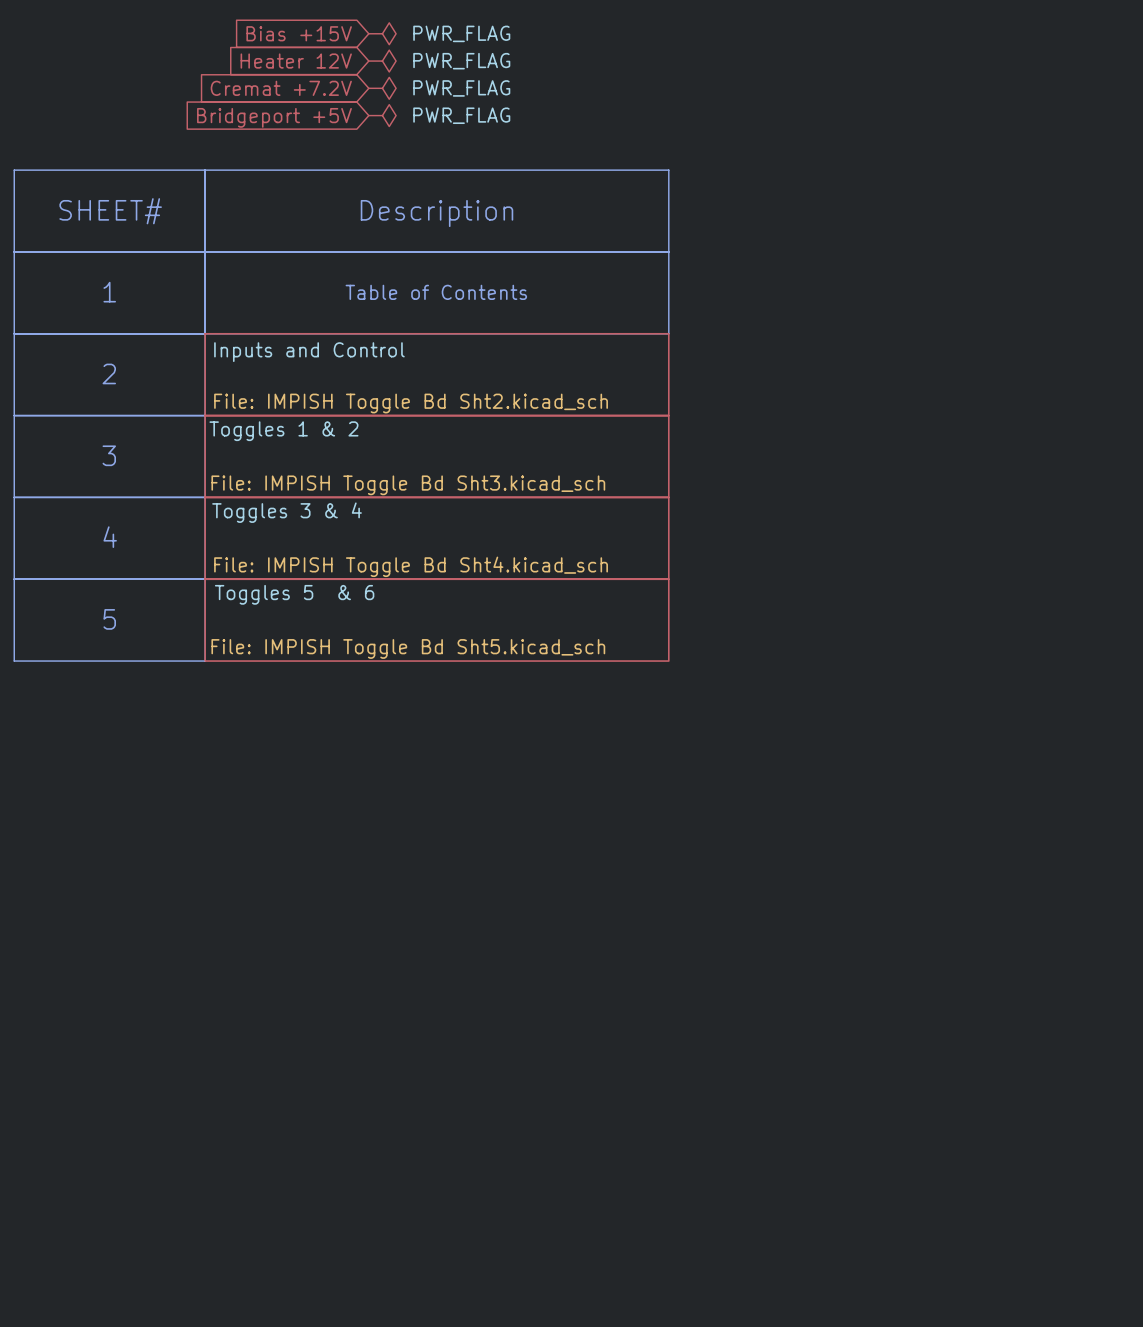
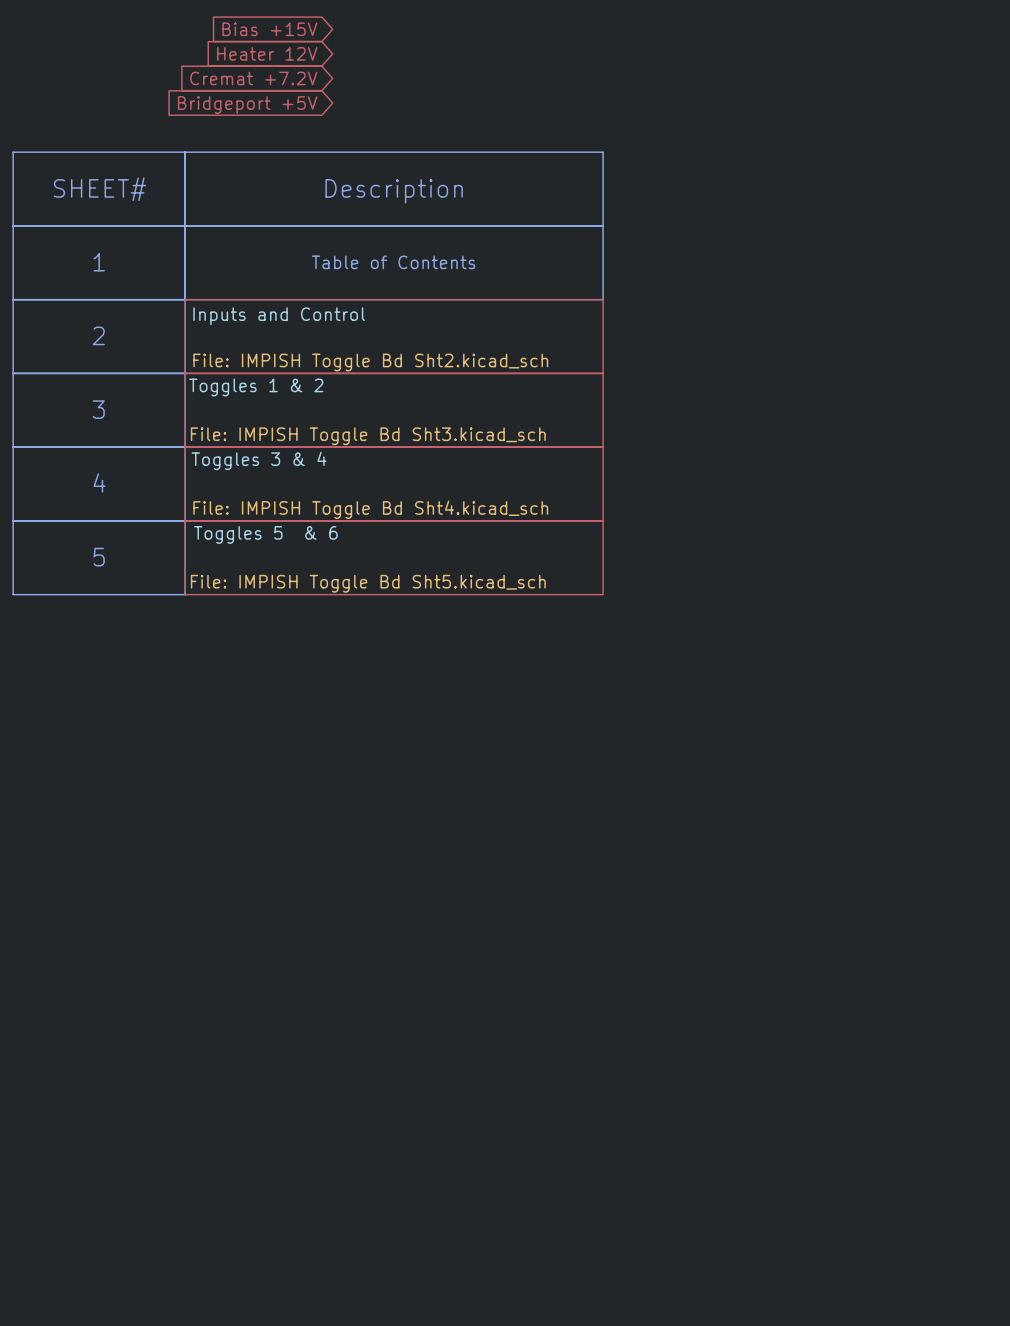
power symbol: PWR_FLAG (382, 33) -> none
power symbol: PWR_FLAG (382, 61) -> none
power symbol: PWR_FLAG (382, 88) -> none
power symbol: PWR_FLAG (382, 115) -> none

